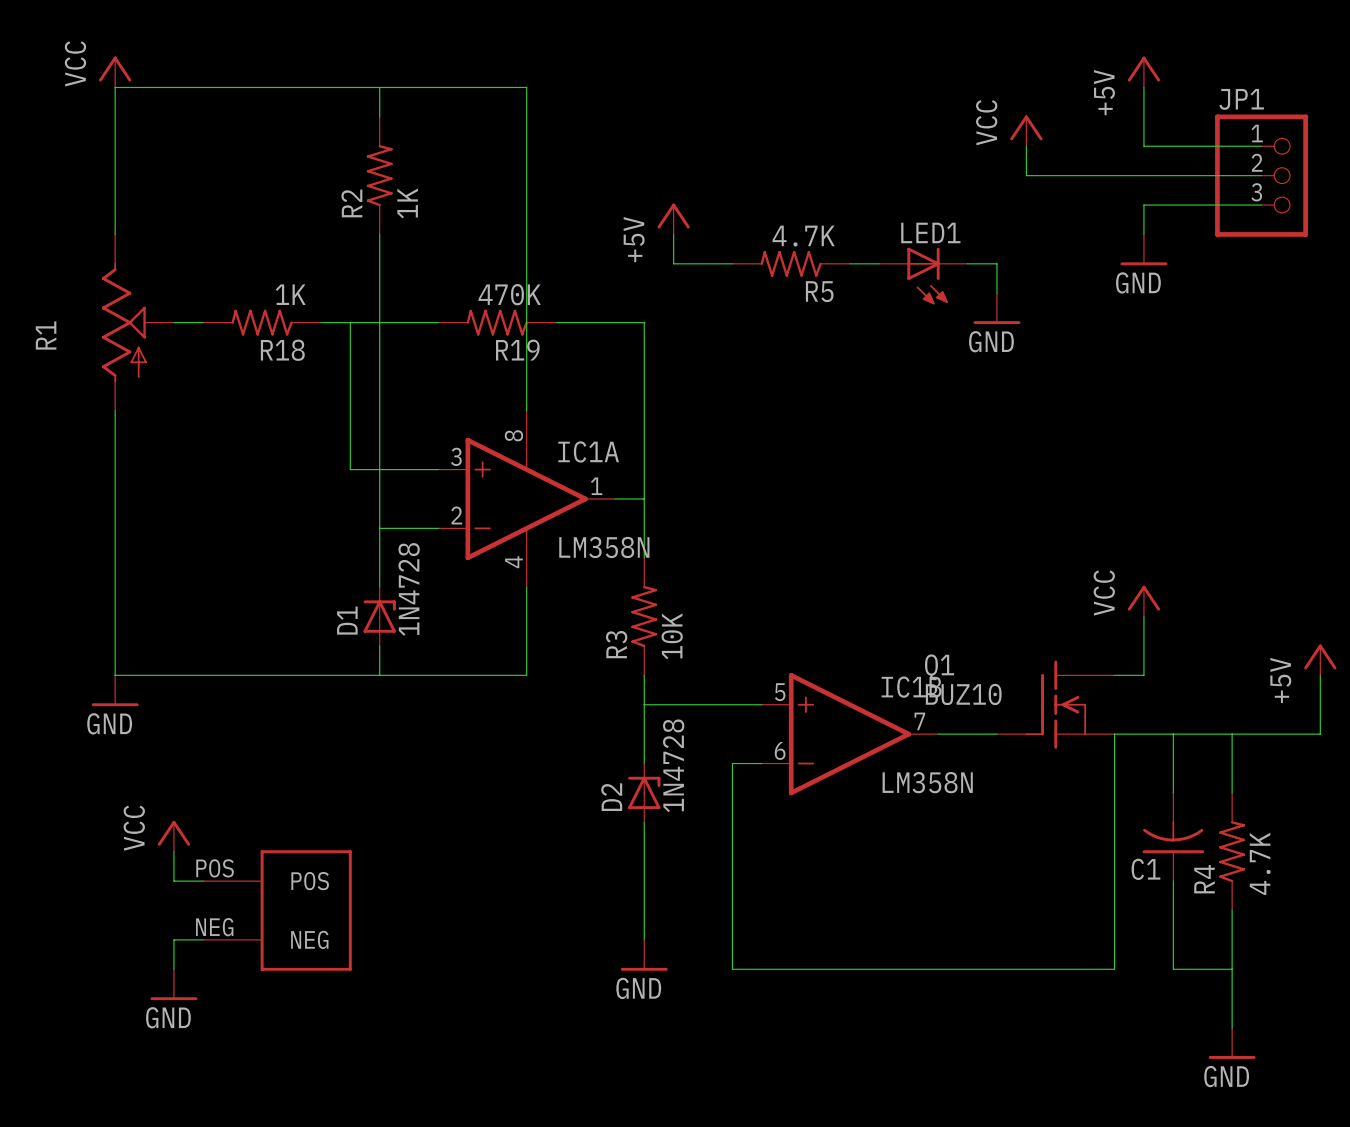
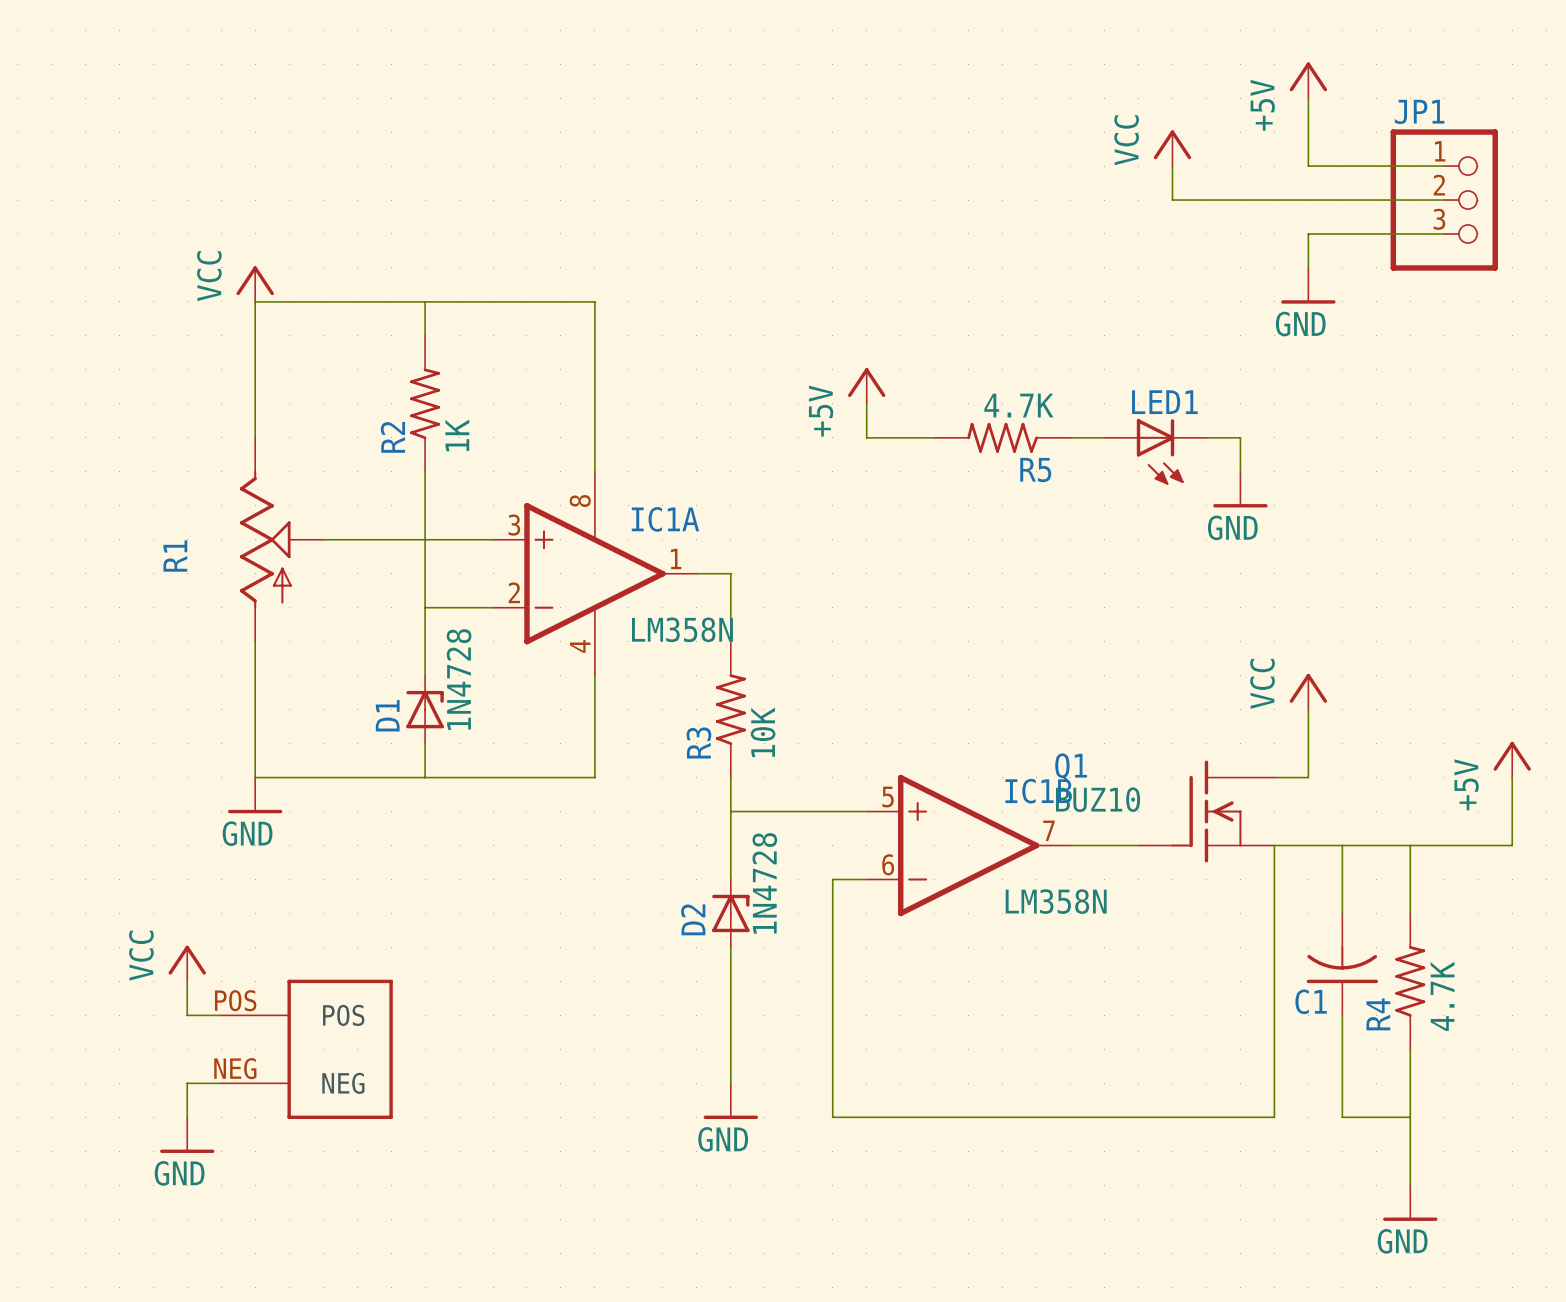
power symbol position: VCC (115, 72) -> VCC (255, 284)
wire: (379, 87) (379, 116) -> none
R2 position: (379, 175) -> (425, 403)
power symbol position: +5V (673, 219) -> +5V (866, 386)
wire: (115, 234) (115, 87) (526, 87) (526, 263) -> (255, 437) (255, 301) (594, 301)
wire: (379, 234) (379, 263) -> none
wire: (673, 234) (673, 263) (732, 263) -> (866, 403) (866, 437) (934, 437)
R5 position: (791, 263) -> (1002, 437)
wire: (850, 263) (879, 263) -> (1070, 437) (1104, 437)
wire: (967, 263) (996, 263) (996, 293) -> (1206, 437) (1240, 437) (1240, 471)
LED1 position: (923, 276) -> (1155, 451)
power symbol position: GND (996, 308) -> GND (1240, 489)
R1 position: (137, 322) -> (281, 539)
wire: (173, 322) (203, 322) -> none
R18: 1K (262, 322) -> none
wire: (320, 322) (438, 322) -> none
wire: (350, 322) (350, 469) -> (323, 539) (391, 539)
R19: 470K (497, 322) -> none
wire: (556, 322) (644, 322) (644, 498) -> none
wire: (115, 410) (115, 675) (232, 675) -> (255, 641) (255, 777)
power symbol position: GND (115, 690) -> GND (255, 795)

